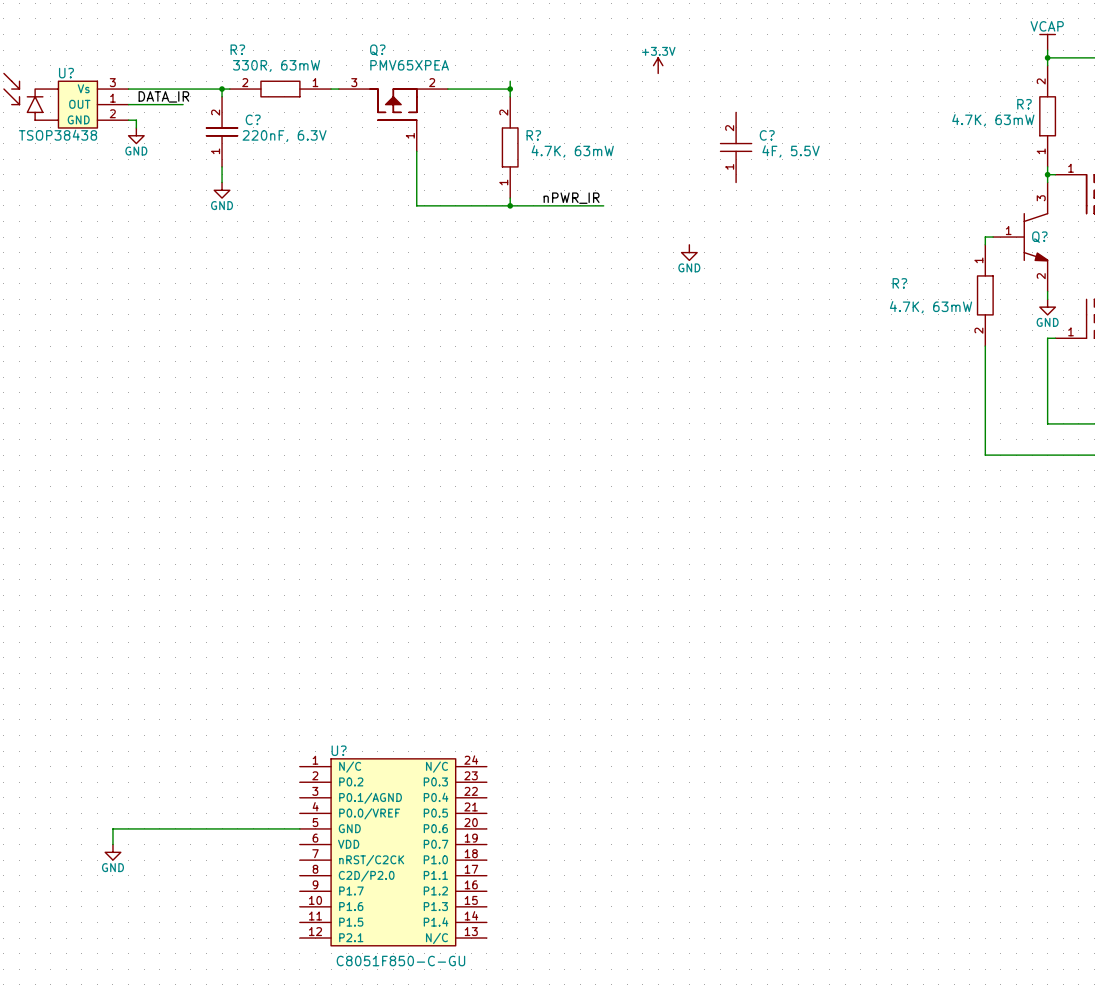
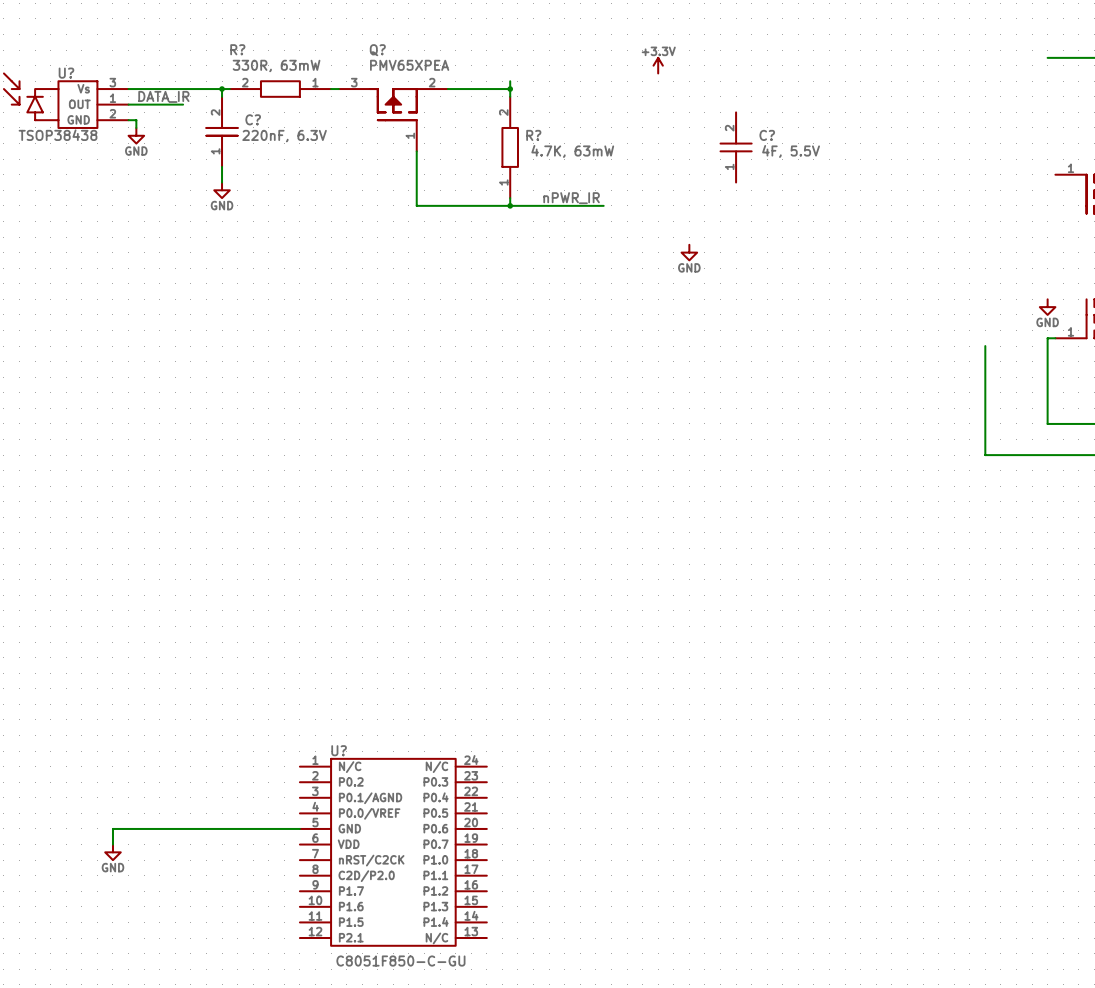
power symbol: VCAP (1047, 42) -> none
wire: (1047, 50) (1047, 65) -> none
junction: (1047, 57) -> none
R?: 4.7K, 63mW (1047, 116) -> none
wire: (1047, 166) (1047, 182) -> none
wire: (1047, 174) (1055, 174) -> none
junction: (1047, 174) -> none
wire: (993, 237) (985, 237) (985, 244) -> none
Q?: (1020, 237) -> none
wire: (1047, 291) (1047, 299) -> none
R?: 4.7K, 63mW (985, 295) -> none

